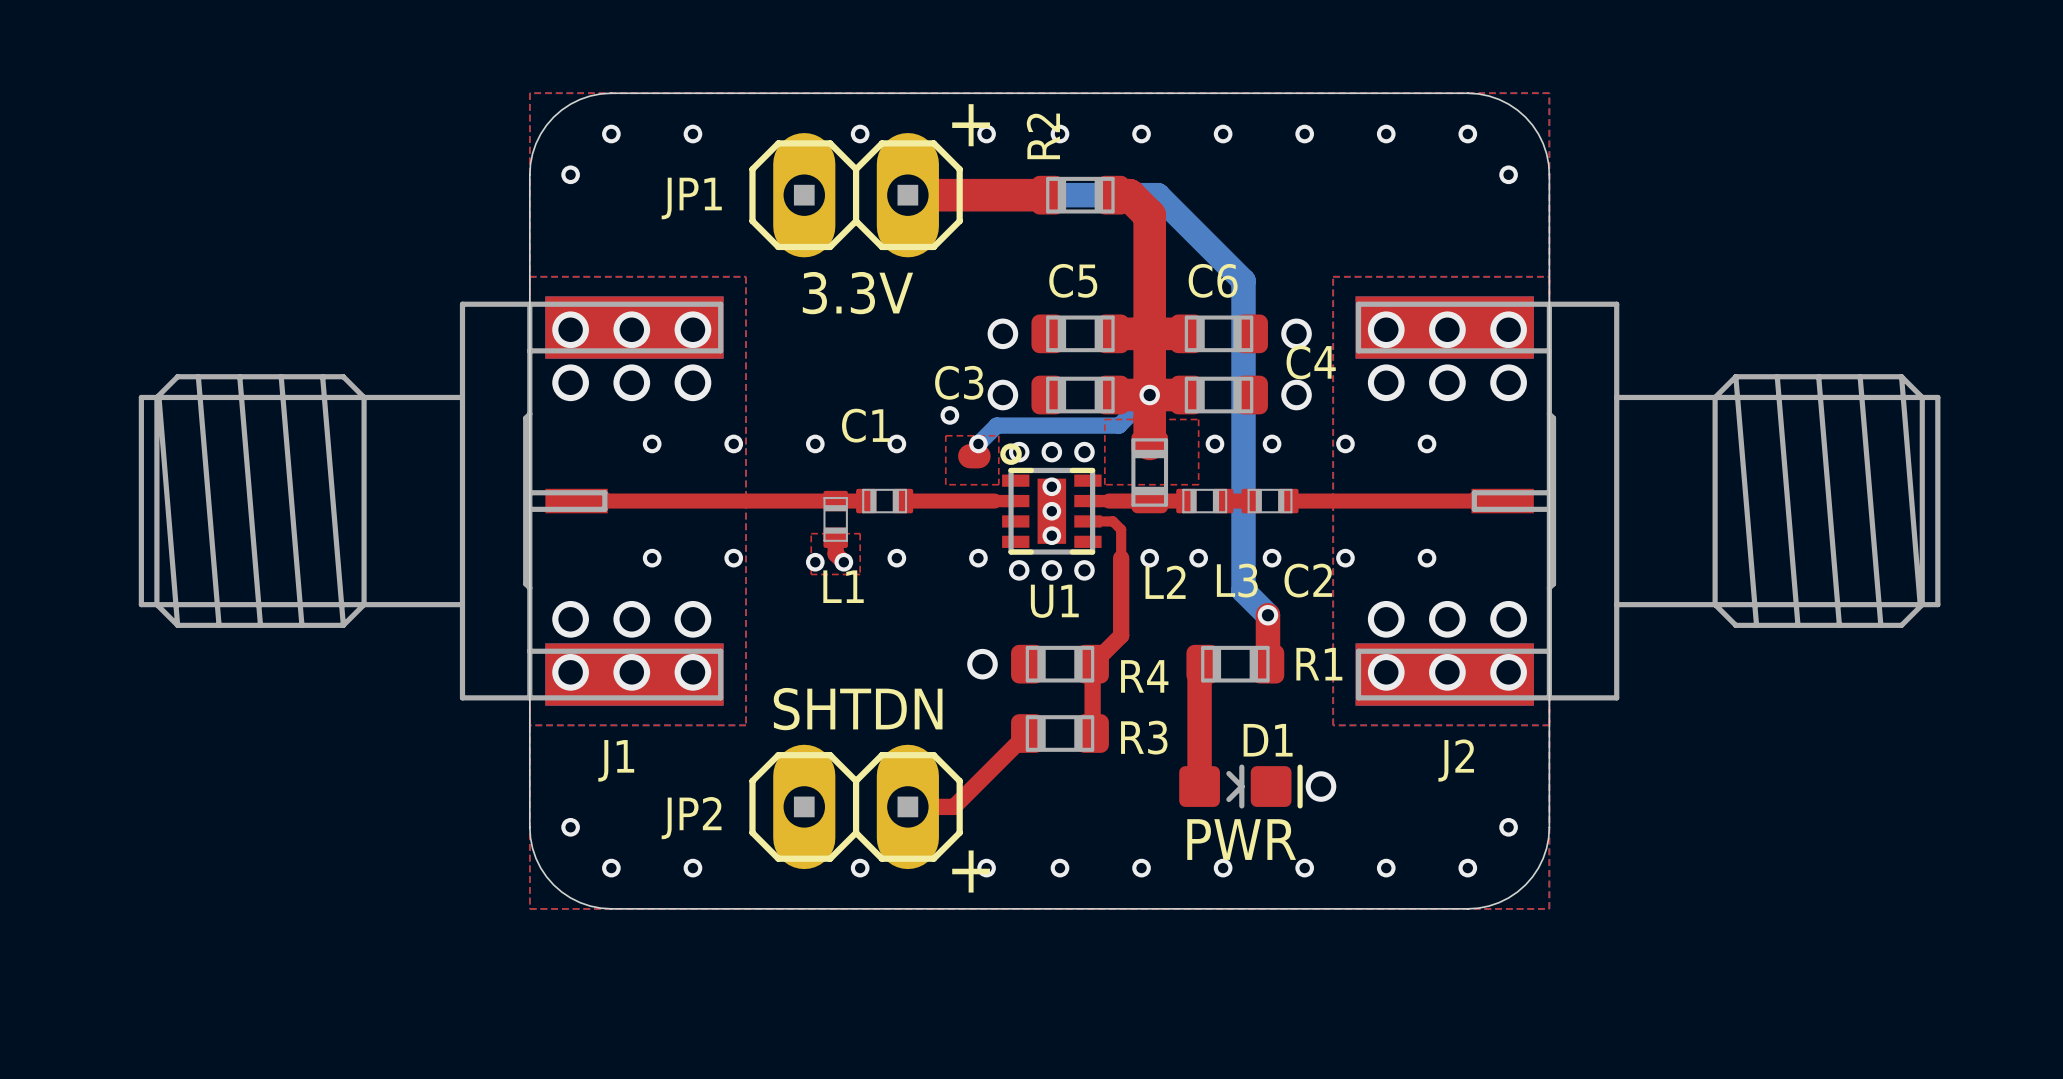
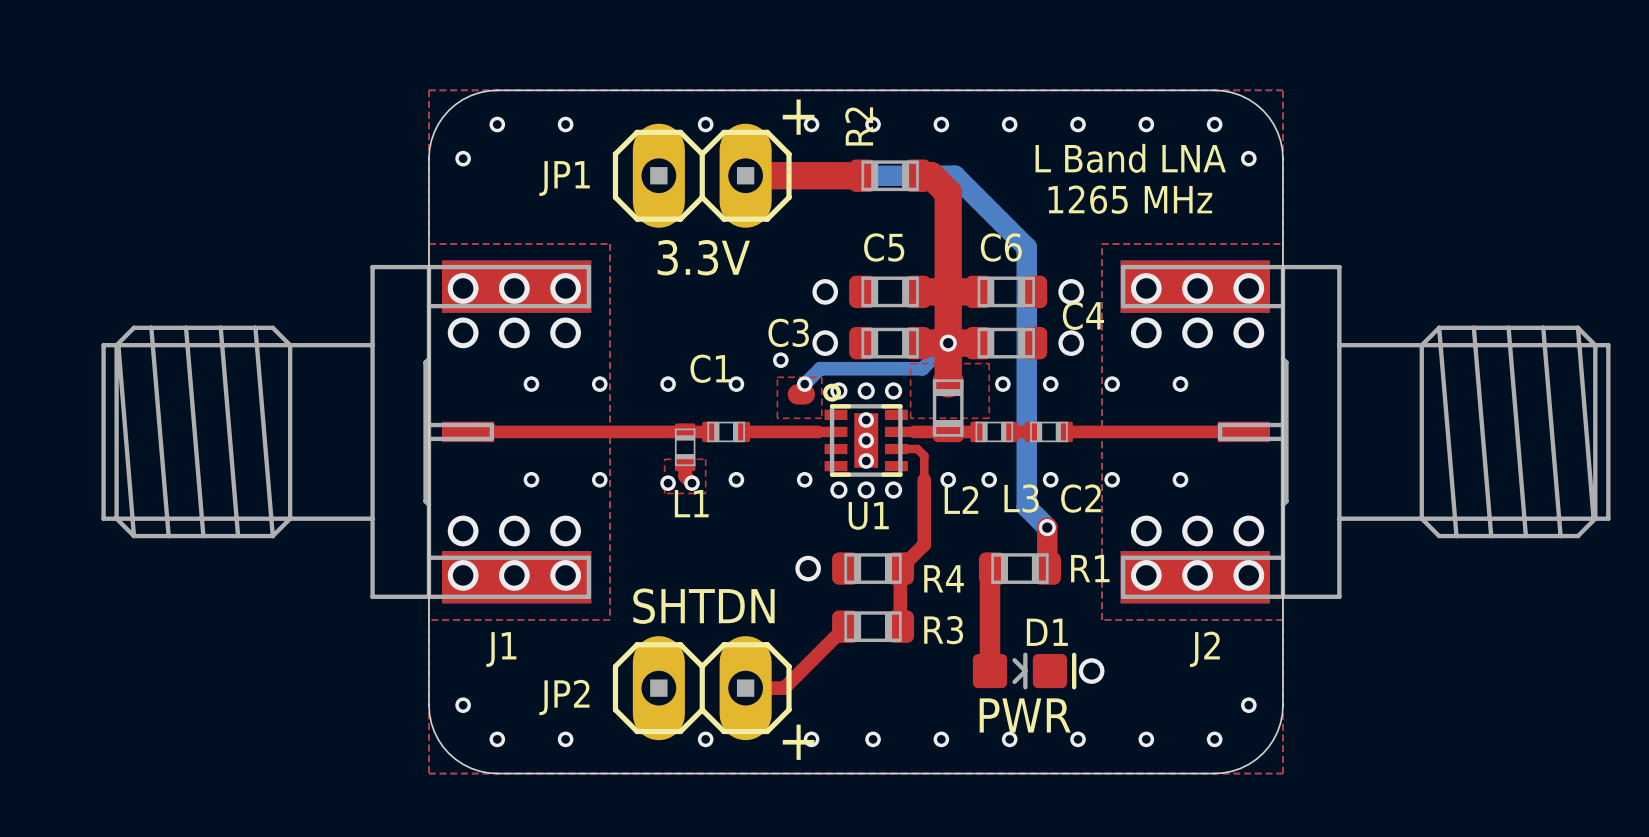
text: none -> L Band LNA (1130, 158)
text: none -> 1265 MHz (1130, 199)

